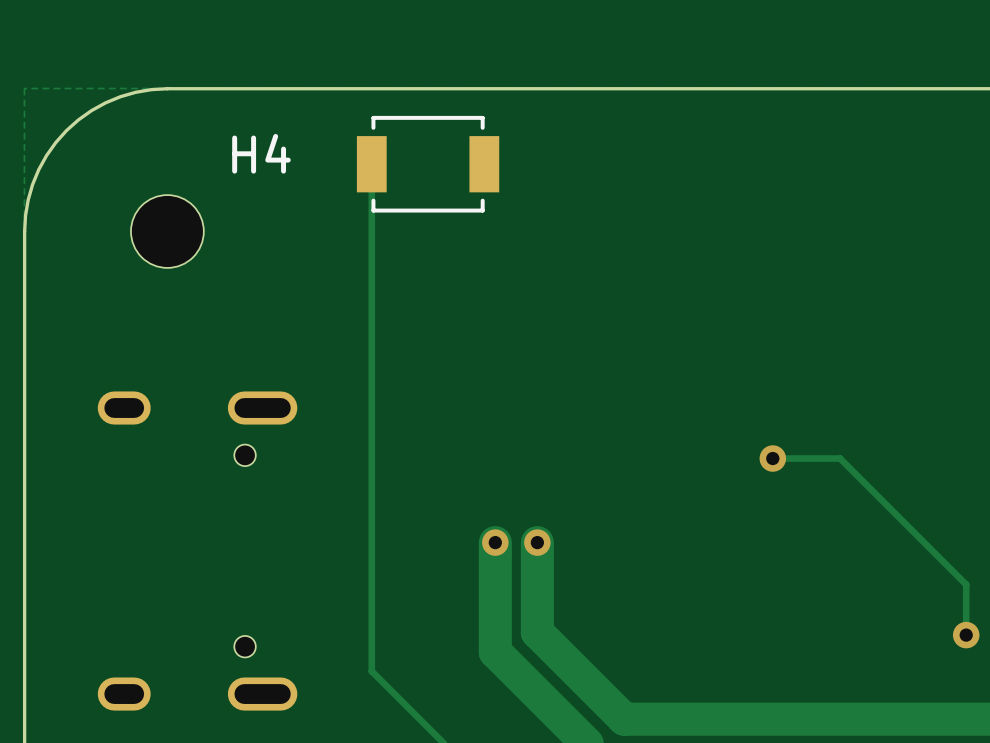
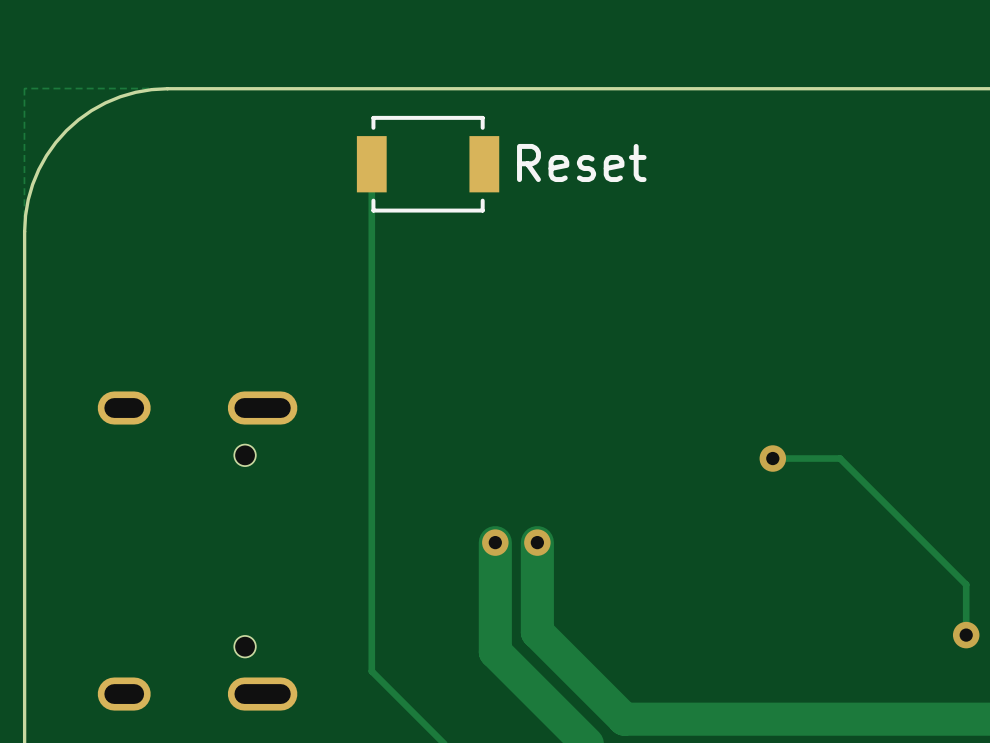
part value: none -> Reset (581, 162)
H4: (167, 231) -> none

